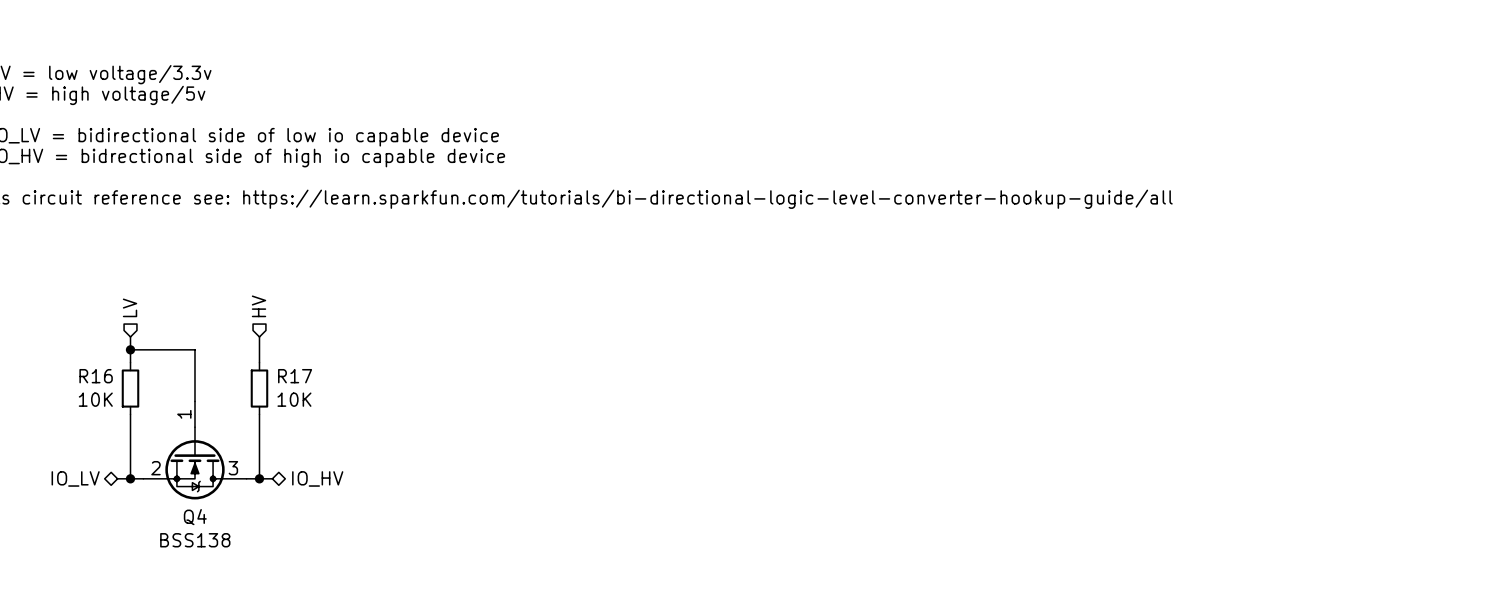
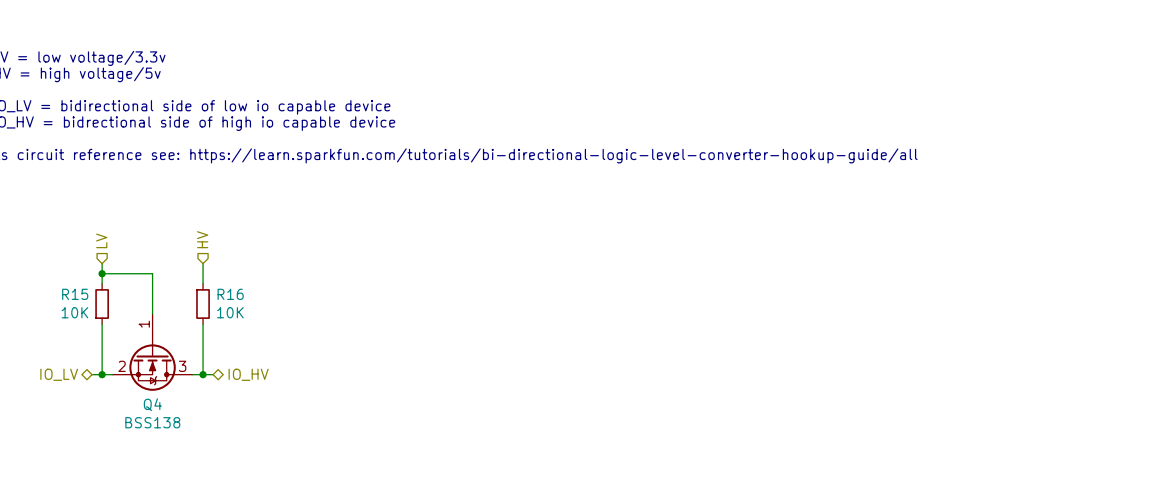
R16 name: R16 (96, 376) -> R15 (75, 294)
R17 name: R17 (295, 376) -> R16 (230, 294)

